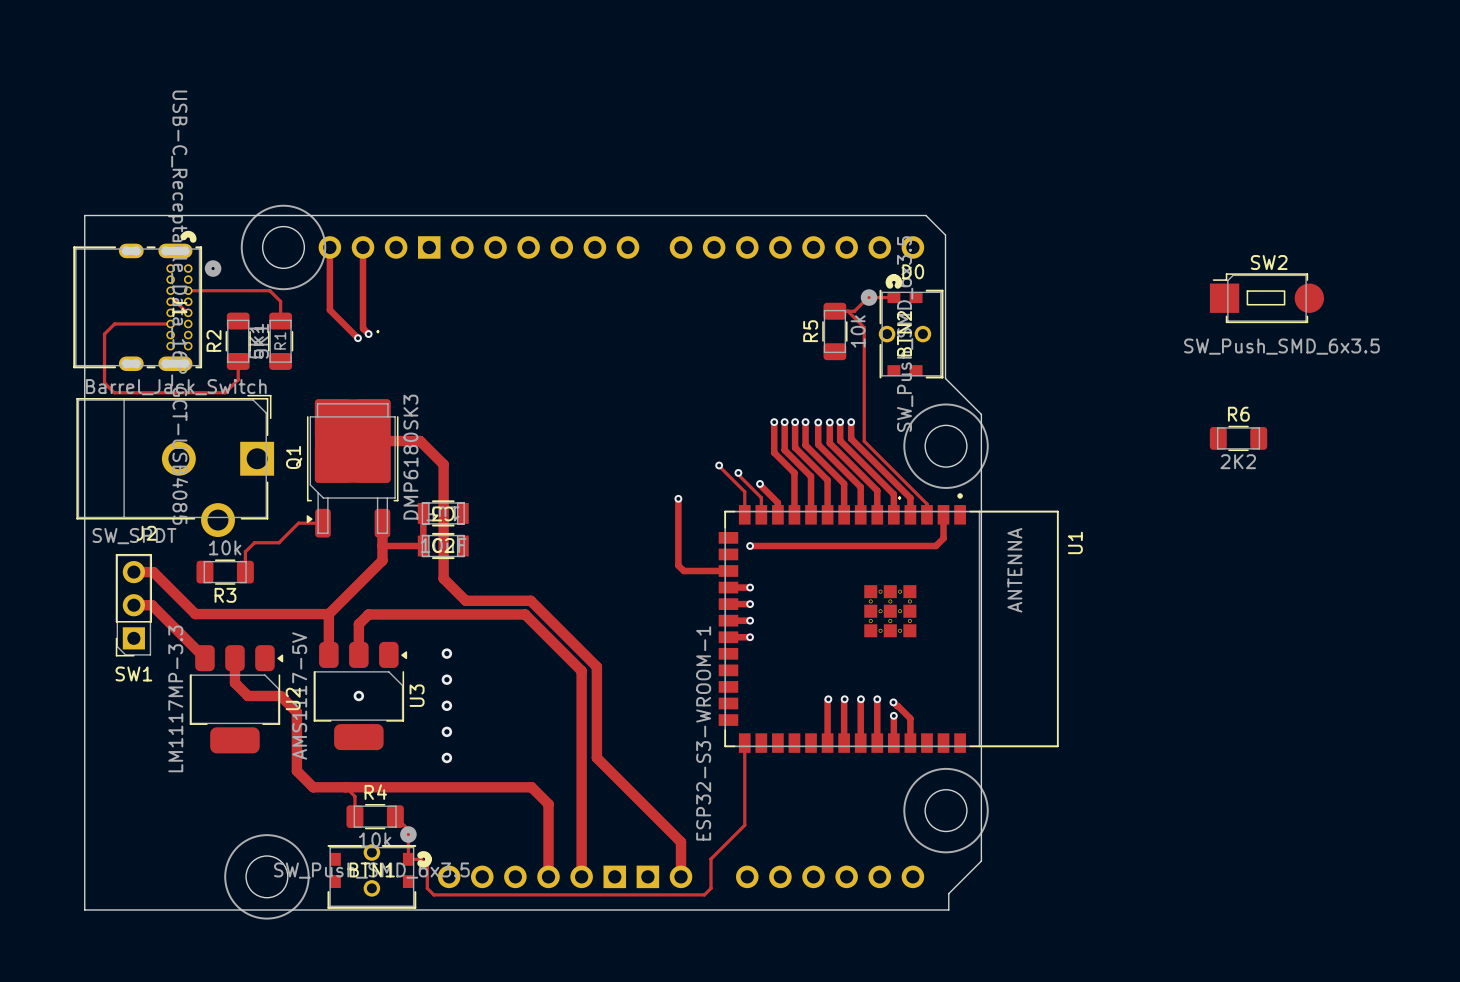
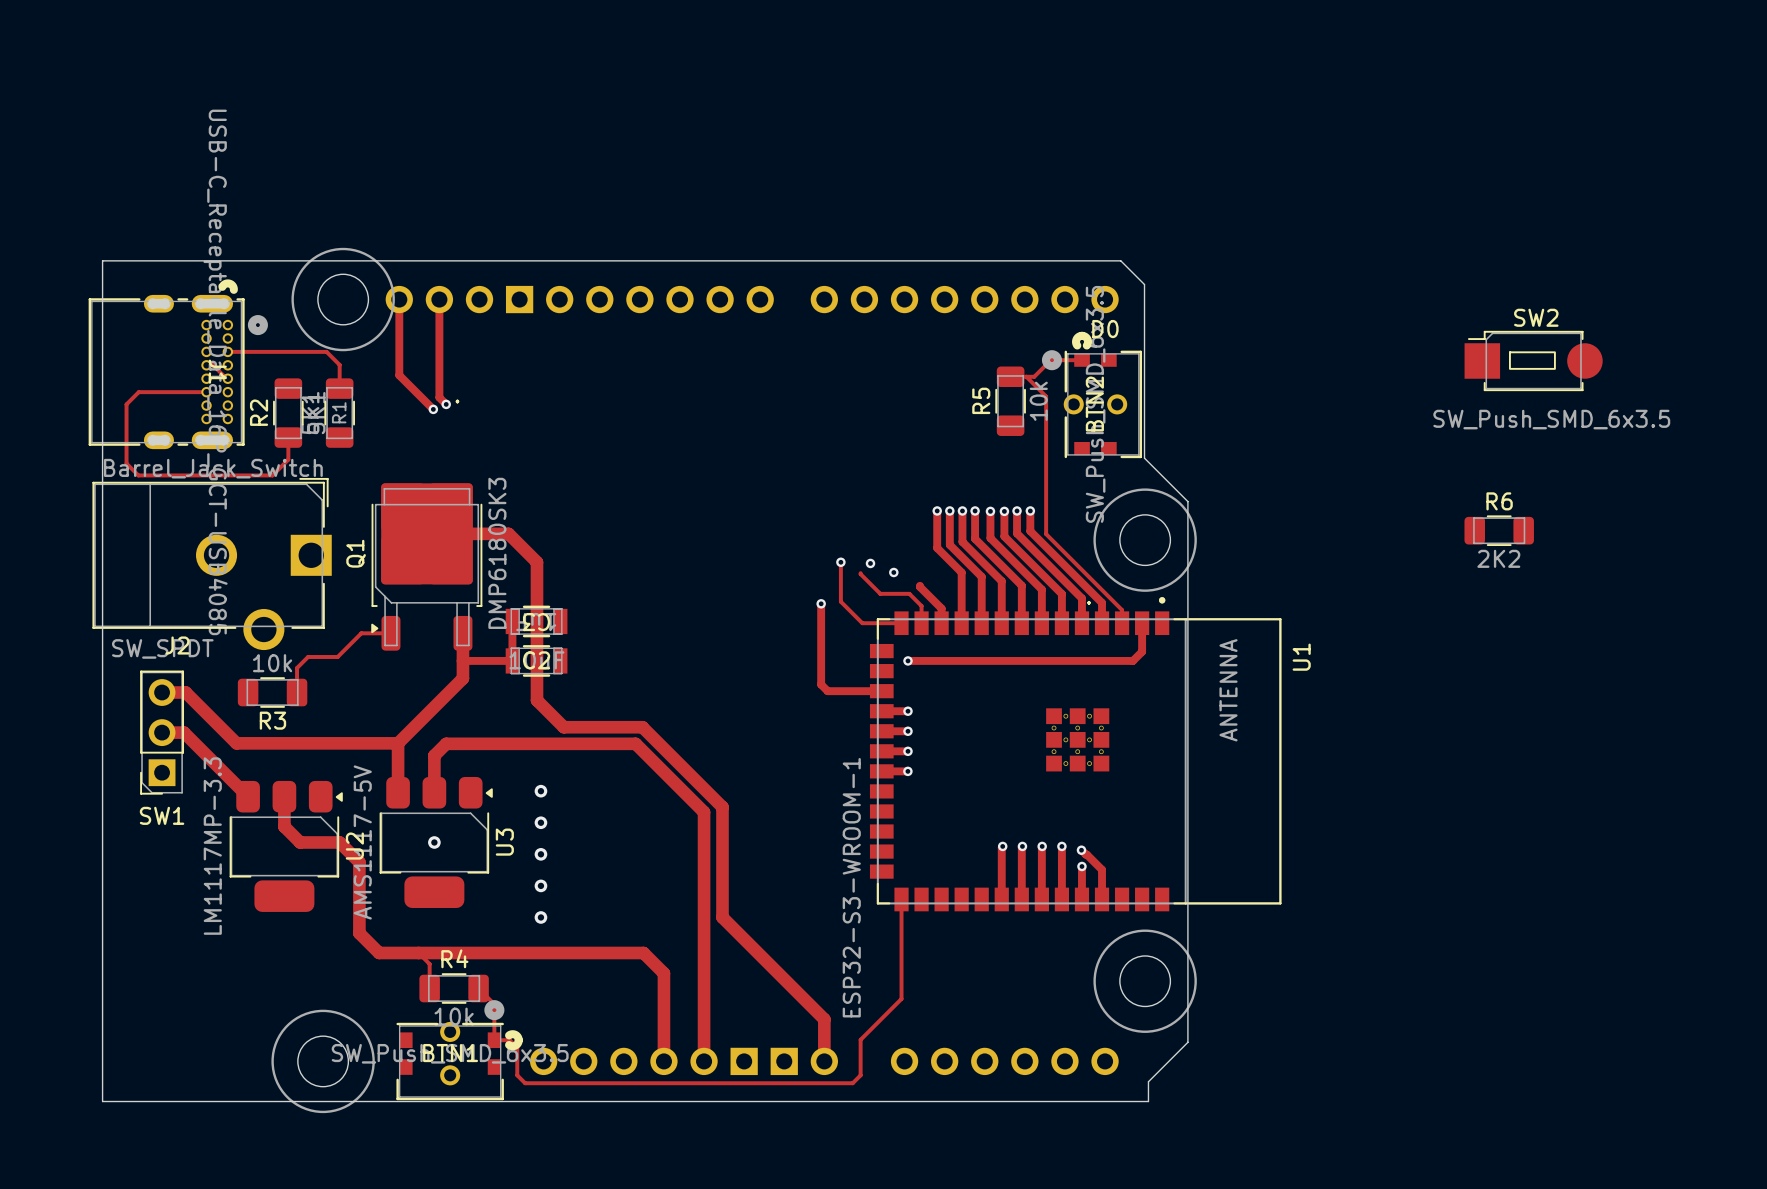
track: (719, 465) (744, 491) (744, 514) -> (840, 562) (840, 601) (862, 623) (901, 623)
track: (738, 472) (761, 497) (761, 500) -> (860, 573) (880, 593) (909, 593) (921, 605)
via position: (760, 483) -> (840, 562)

